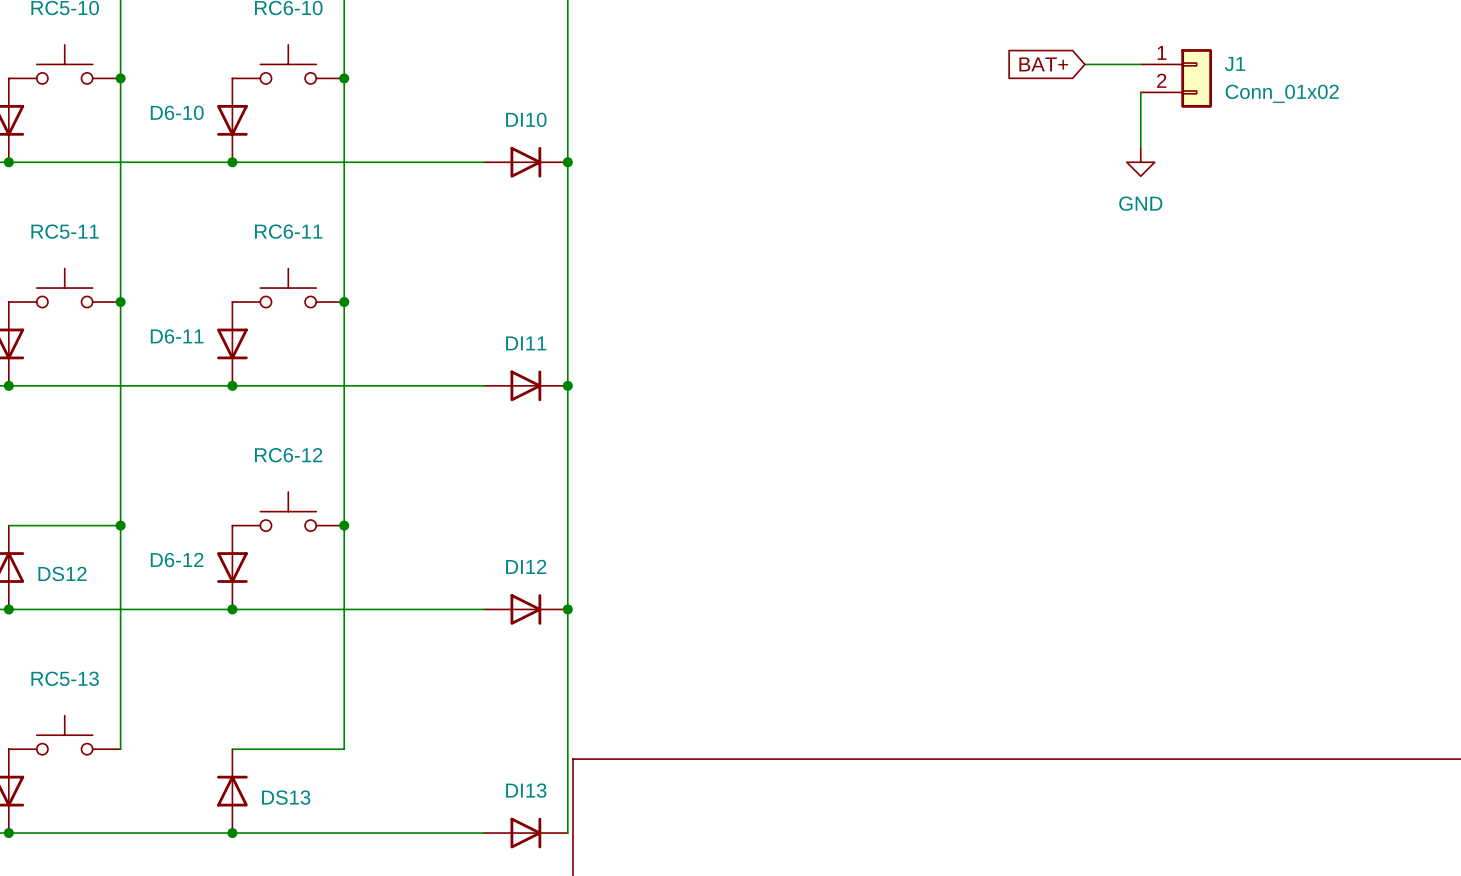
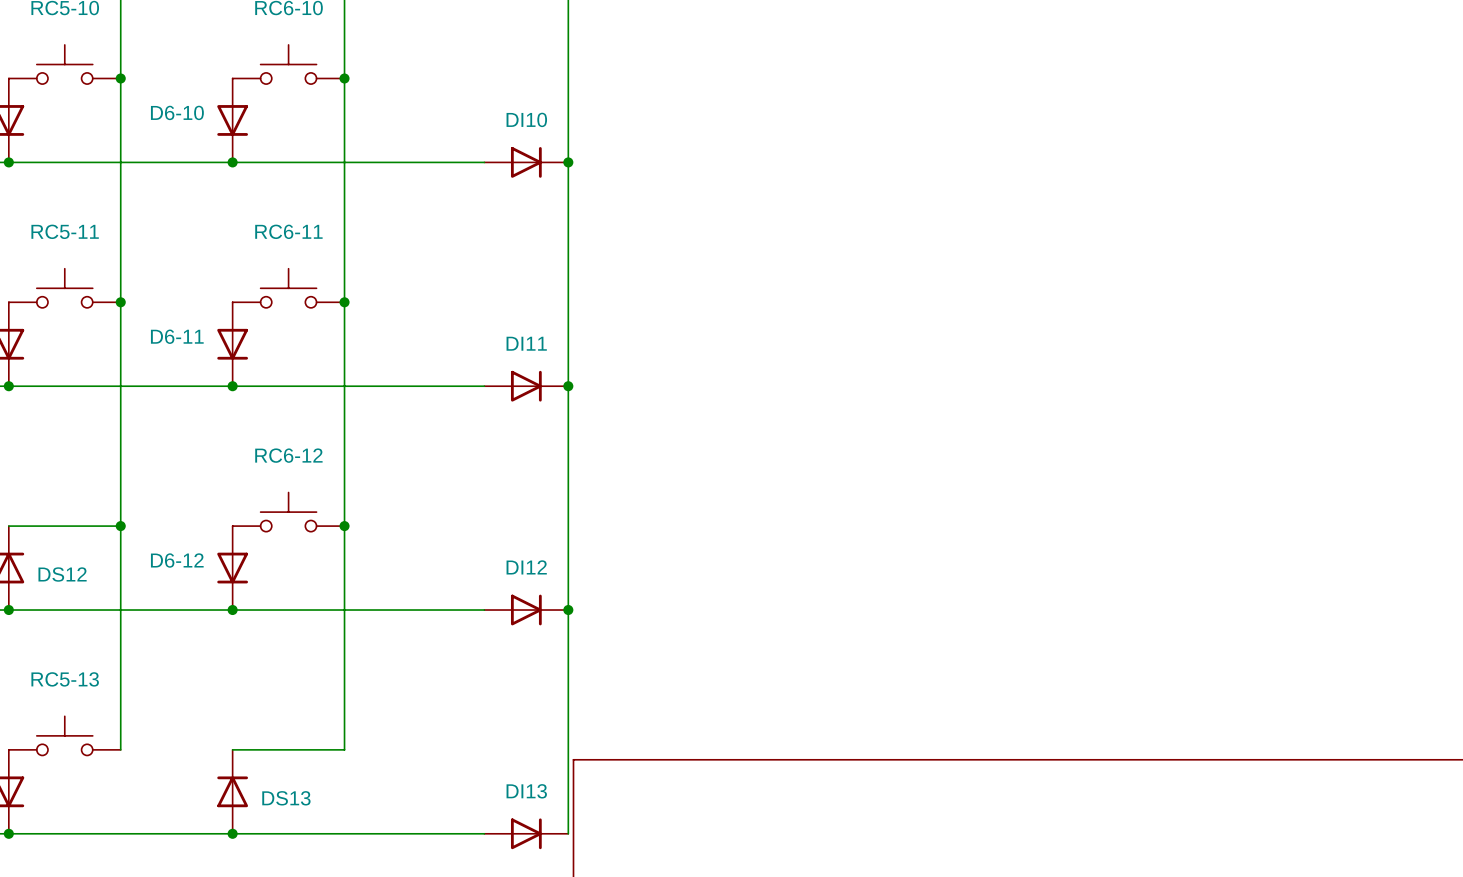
global label: BAT+ (1043, 64) -> none
wire: (1084, 64) (1140, 64) -> none
J1: Conn_01x02 (1176, 78) -> none
wire: (1140, 92) (1140, 148) -> none
power symbol: GND (1140, 162) -> none

